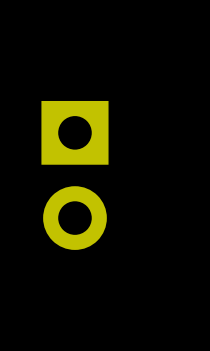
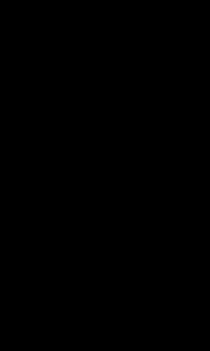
part: (74, 175) -> none

